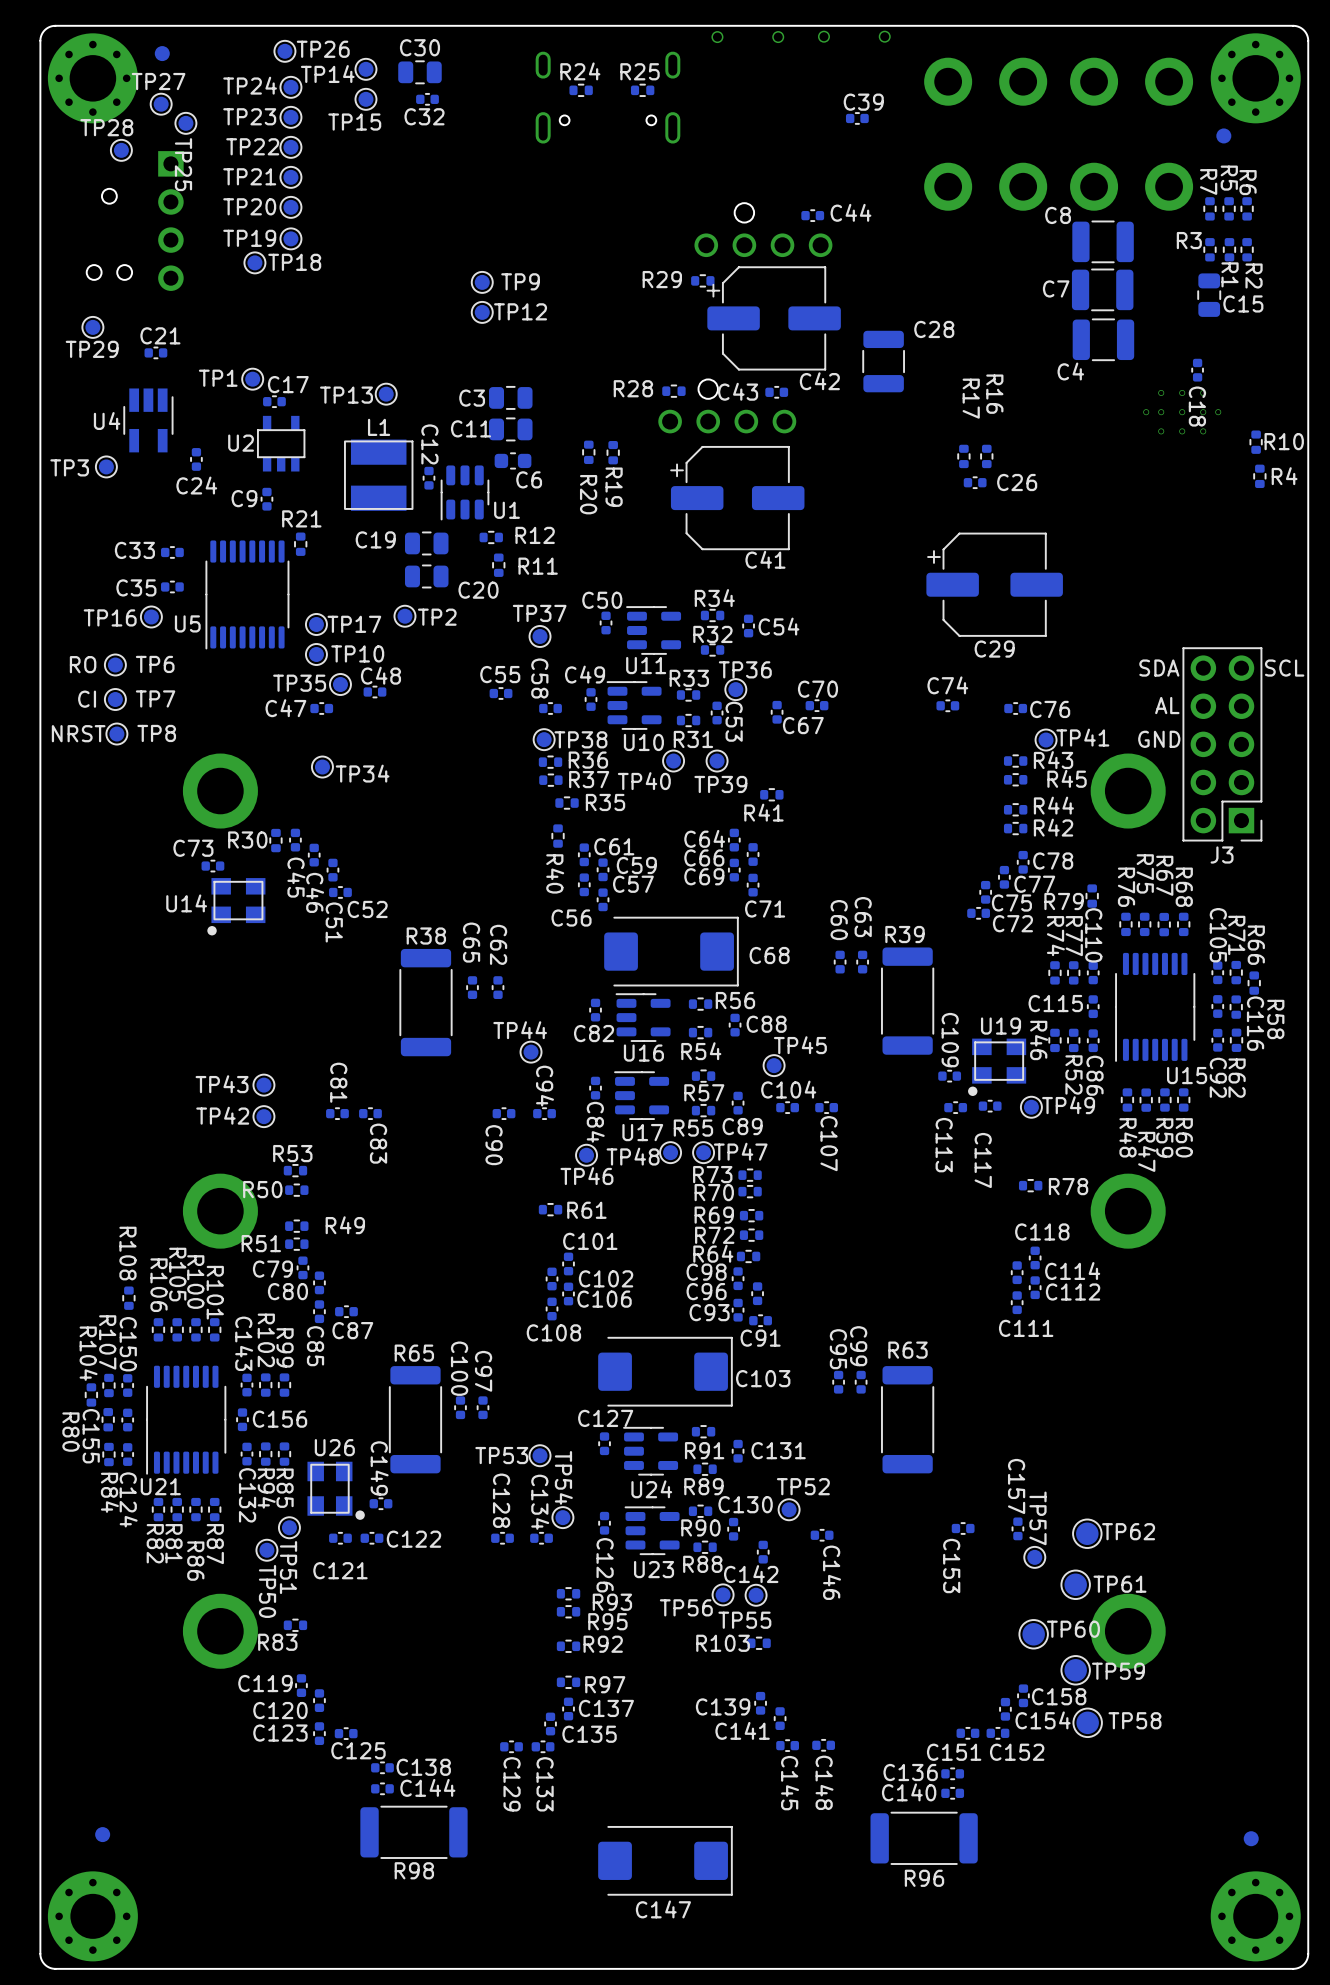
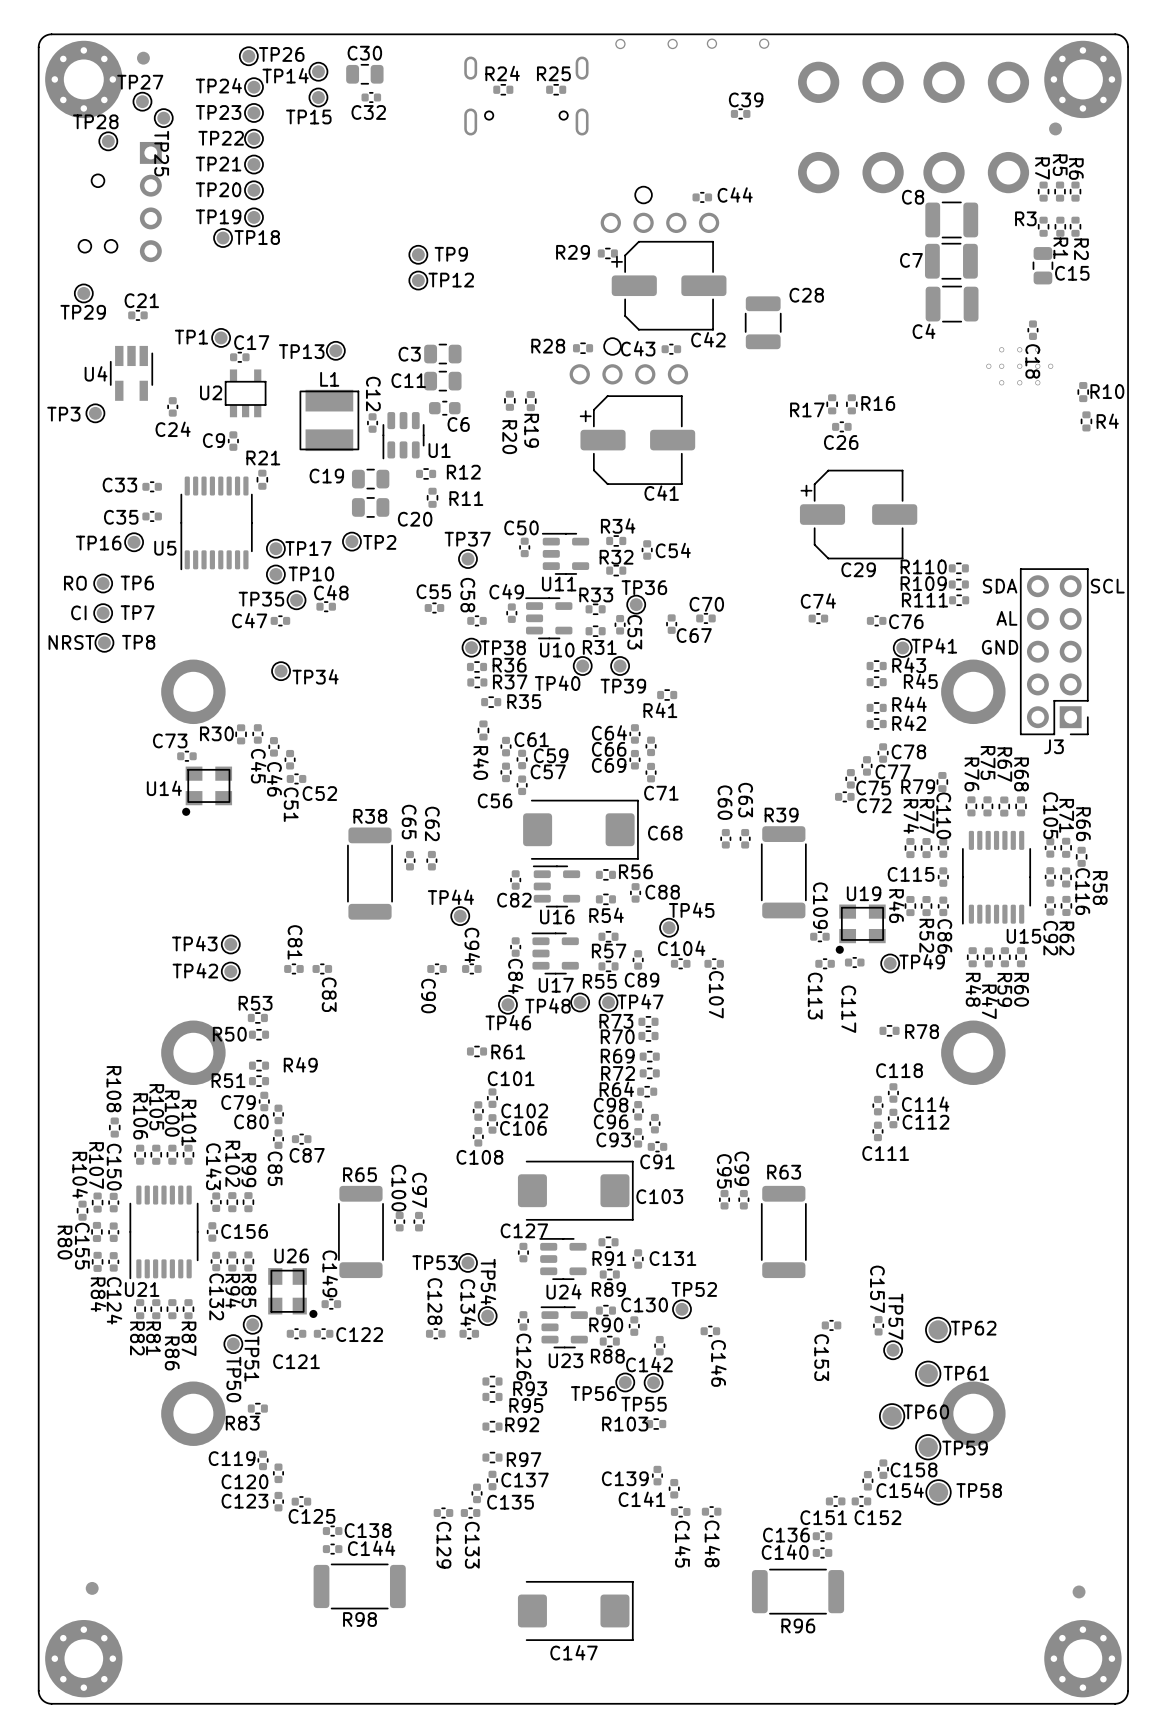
R16 name rotation: 0° (994, 394) -> 90° counterclockwise (878, 403)
R16 name position: R16 (994, 394) -> R16 (878, 403)
R17 name rotation: 0° (971, 398) -> 90° counterclockwise (807, 409)
R17 name position: R17 (971, 398) -> R17 (807, 409)
C26 name position: C26 (1017, 482) -> C26 (841, 442)
R110: none -> (958, 568)
R109: none -> (958, 584)
R111: none -> (959, 600)

